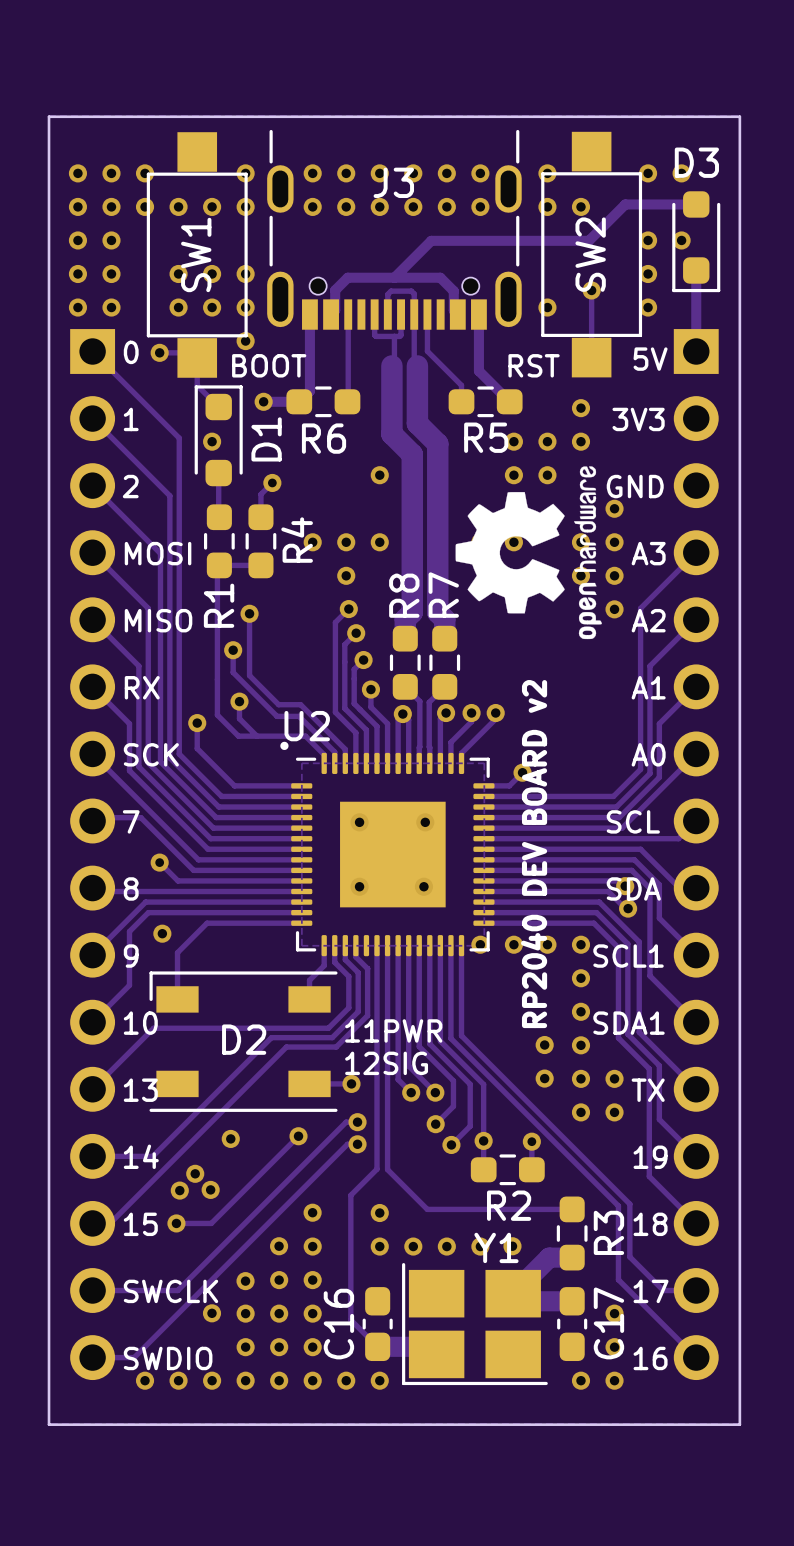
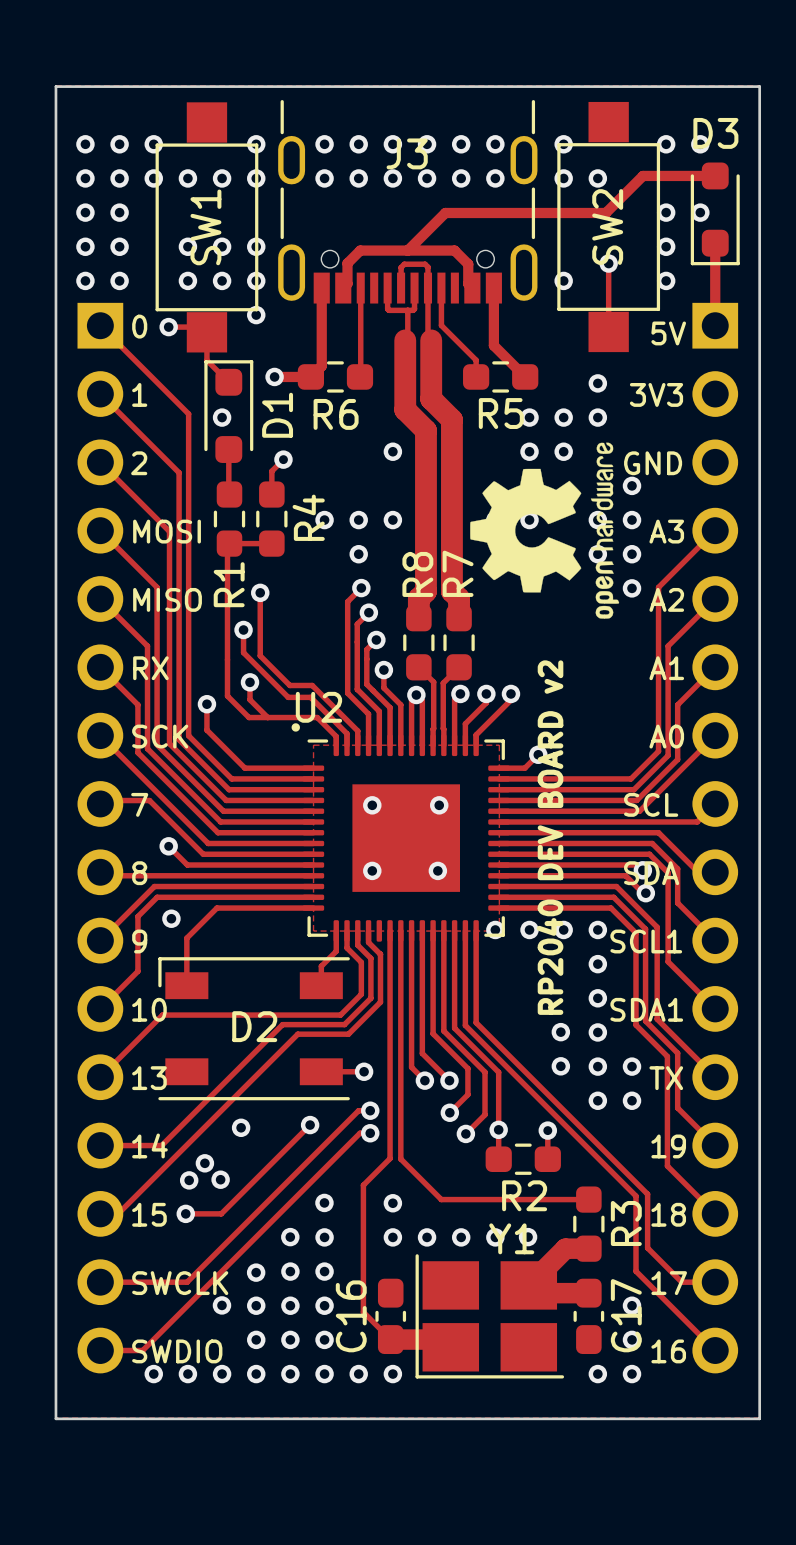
text: BOOT (269, 365) -> none
text: RST (534, 365) -> none
text: 11PWR (393, 1030) -> none
text: 12SIG (386, 1063) -> none

